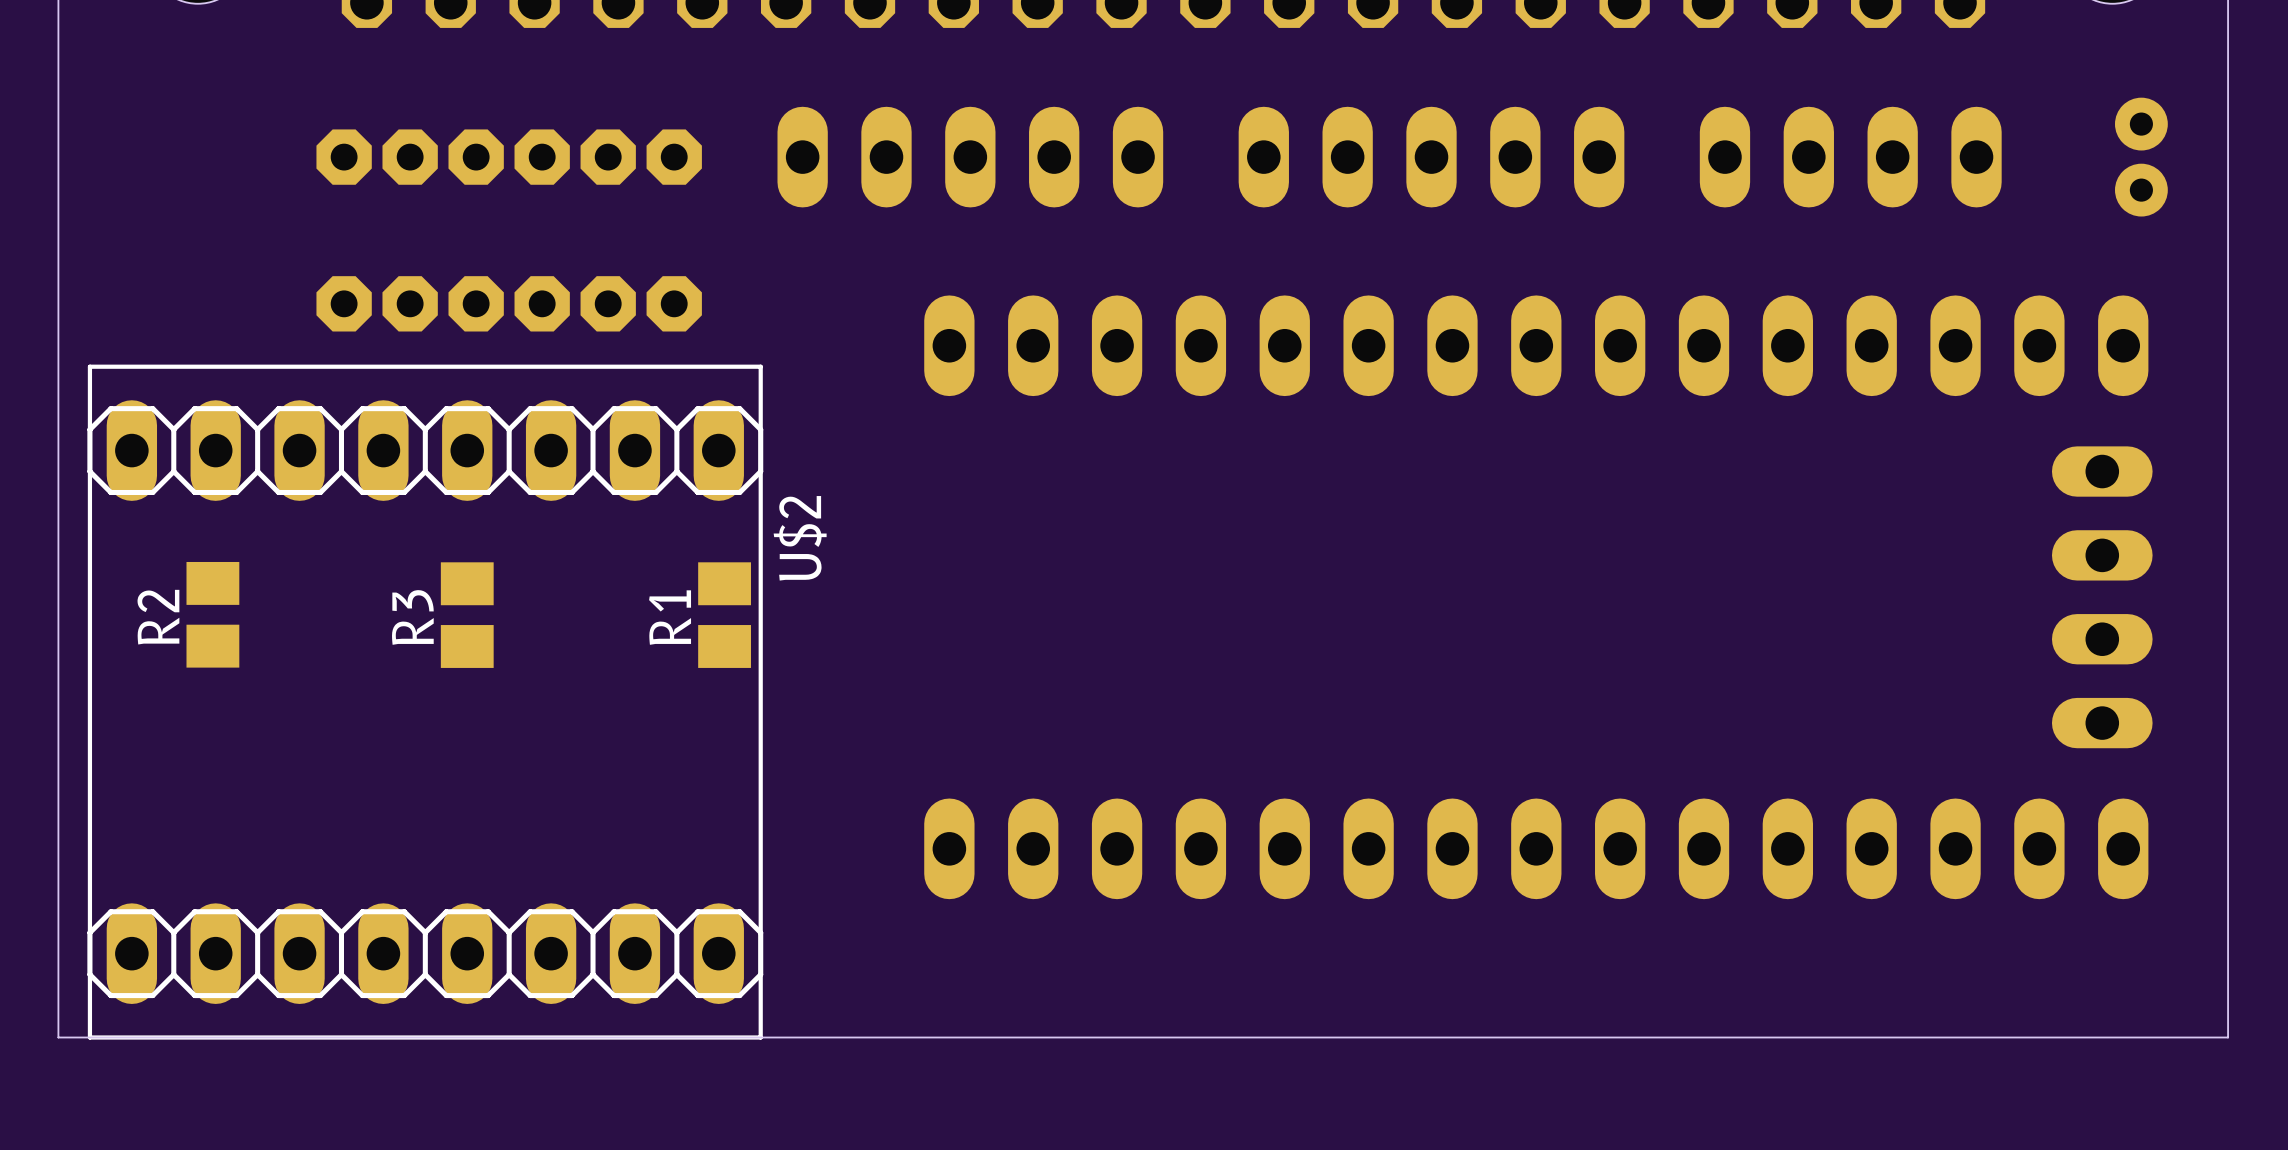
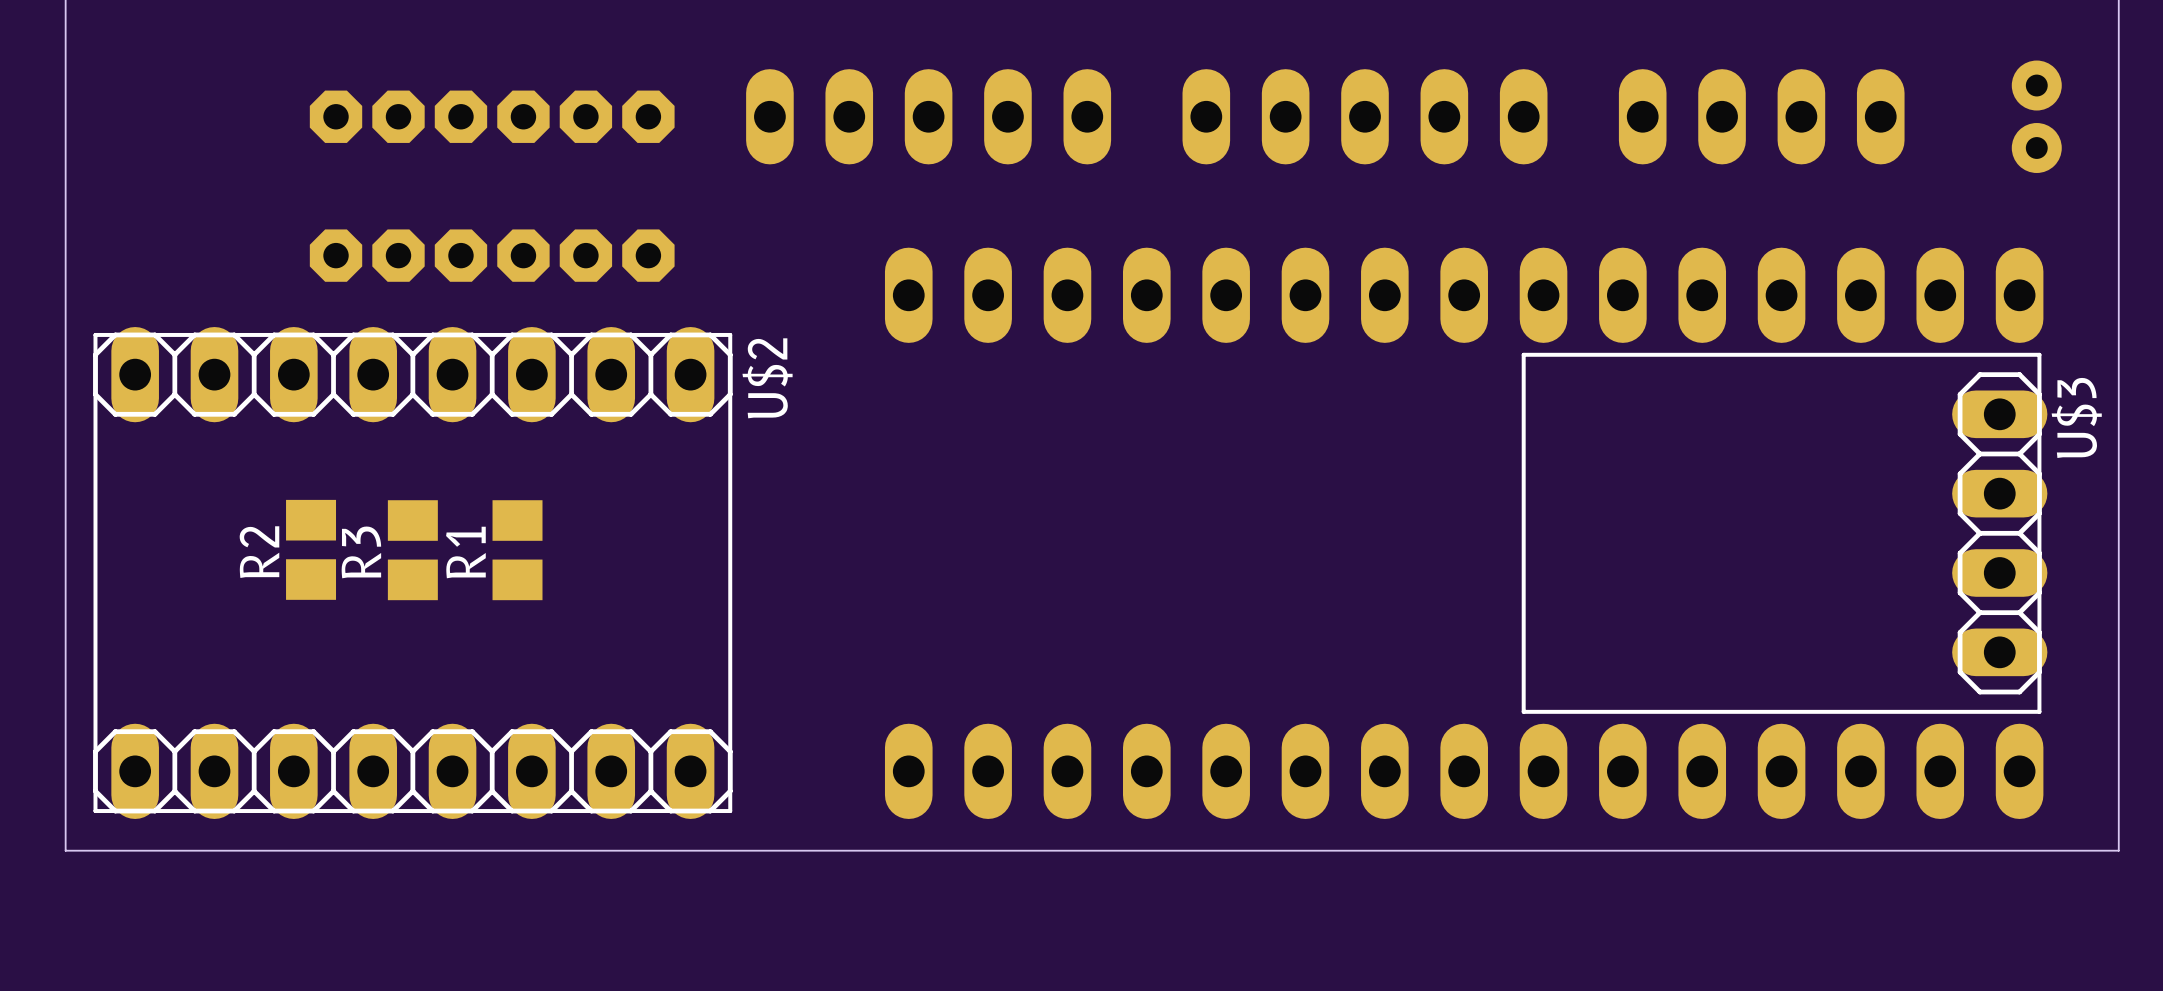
U$2 footprint: [87, 364, 764, 1040] -> [93, 327, 733, 819]
U$3 side: top (2102, 597) -> bottom (1784, 533)
R2 position: (212, 614) -> (311, 549)
R3 position: (467, 615) -> (412, 550)
R1 position: (724, 615) -> (517, 550)
board edge: (2228, 932) (2228, 1037) (58, 1037) (58, 932) -> (2118, 850) (65, 850)

